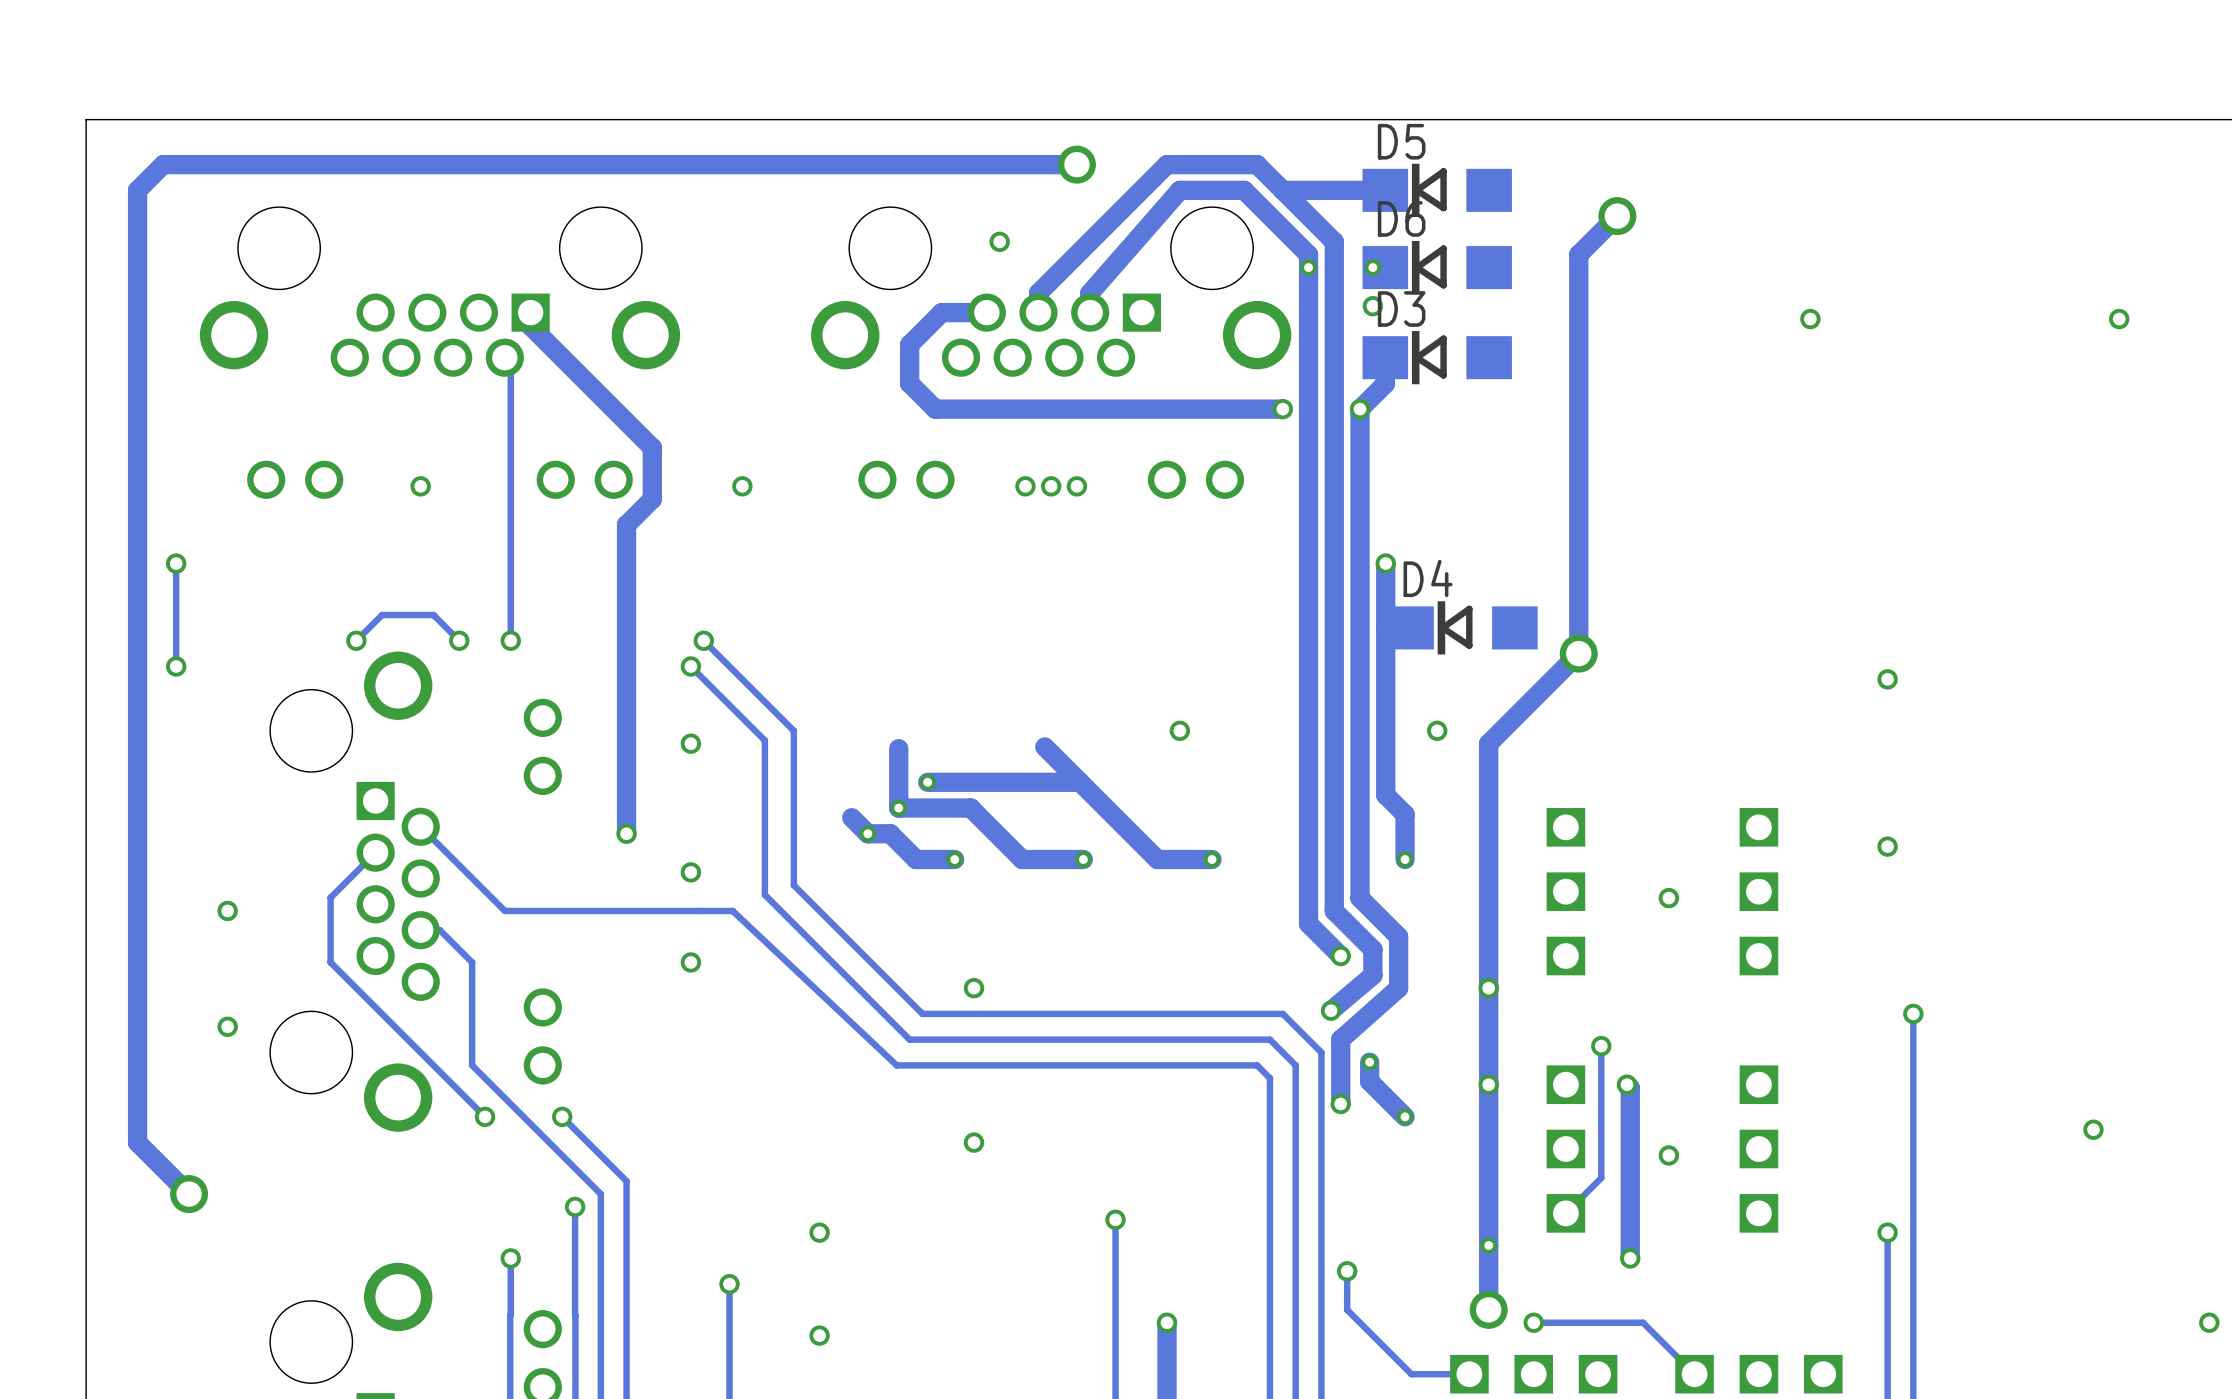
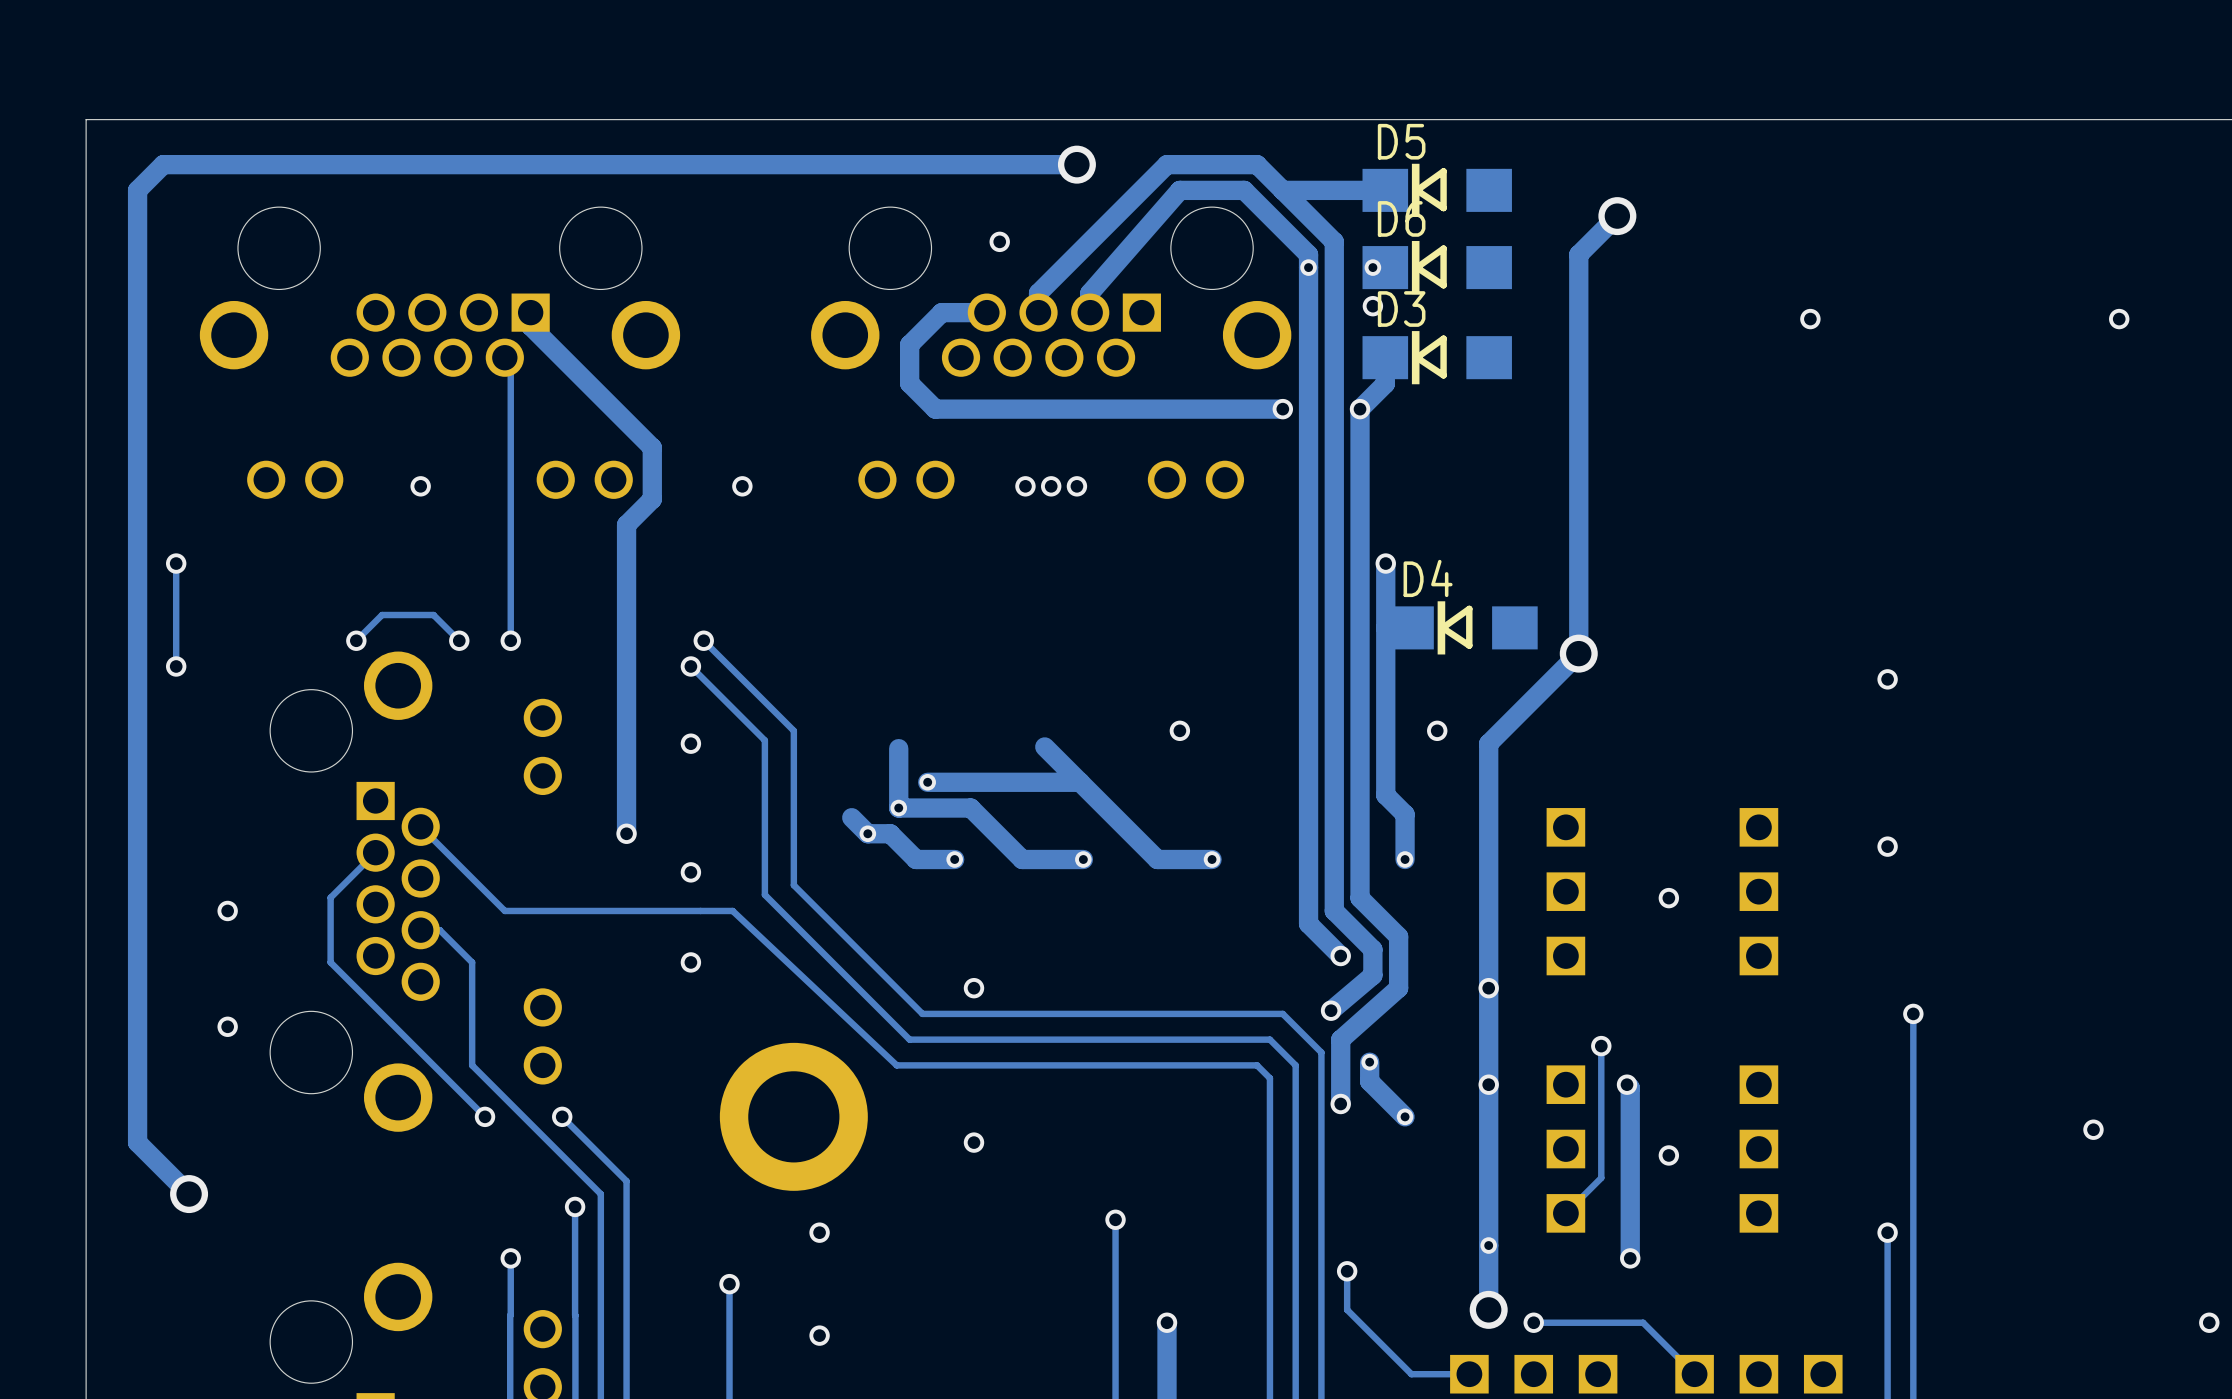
part: none -> (793, 1116)

